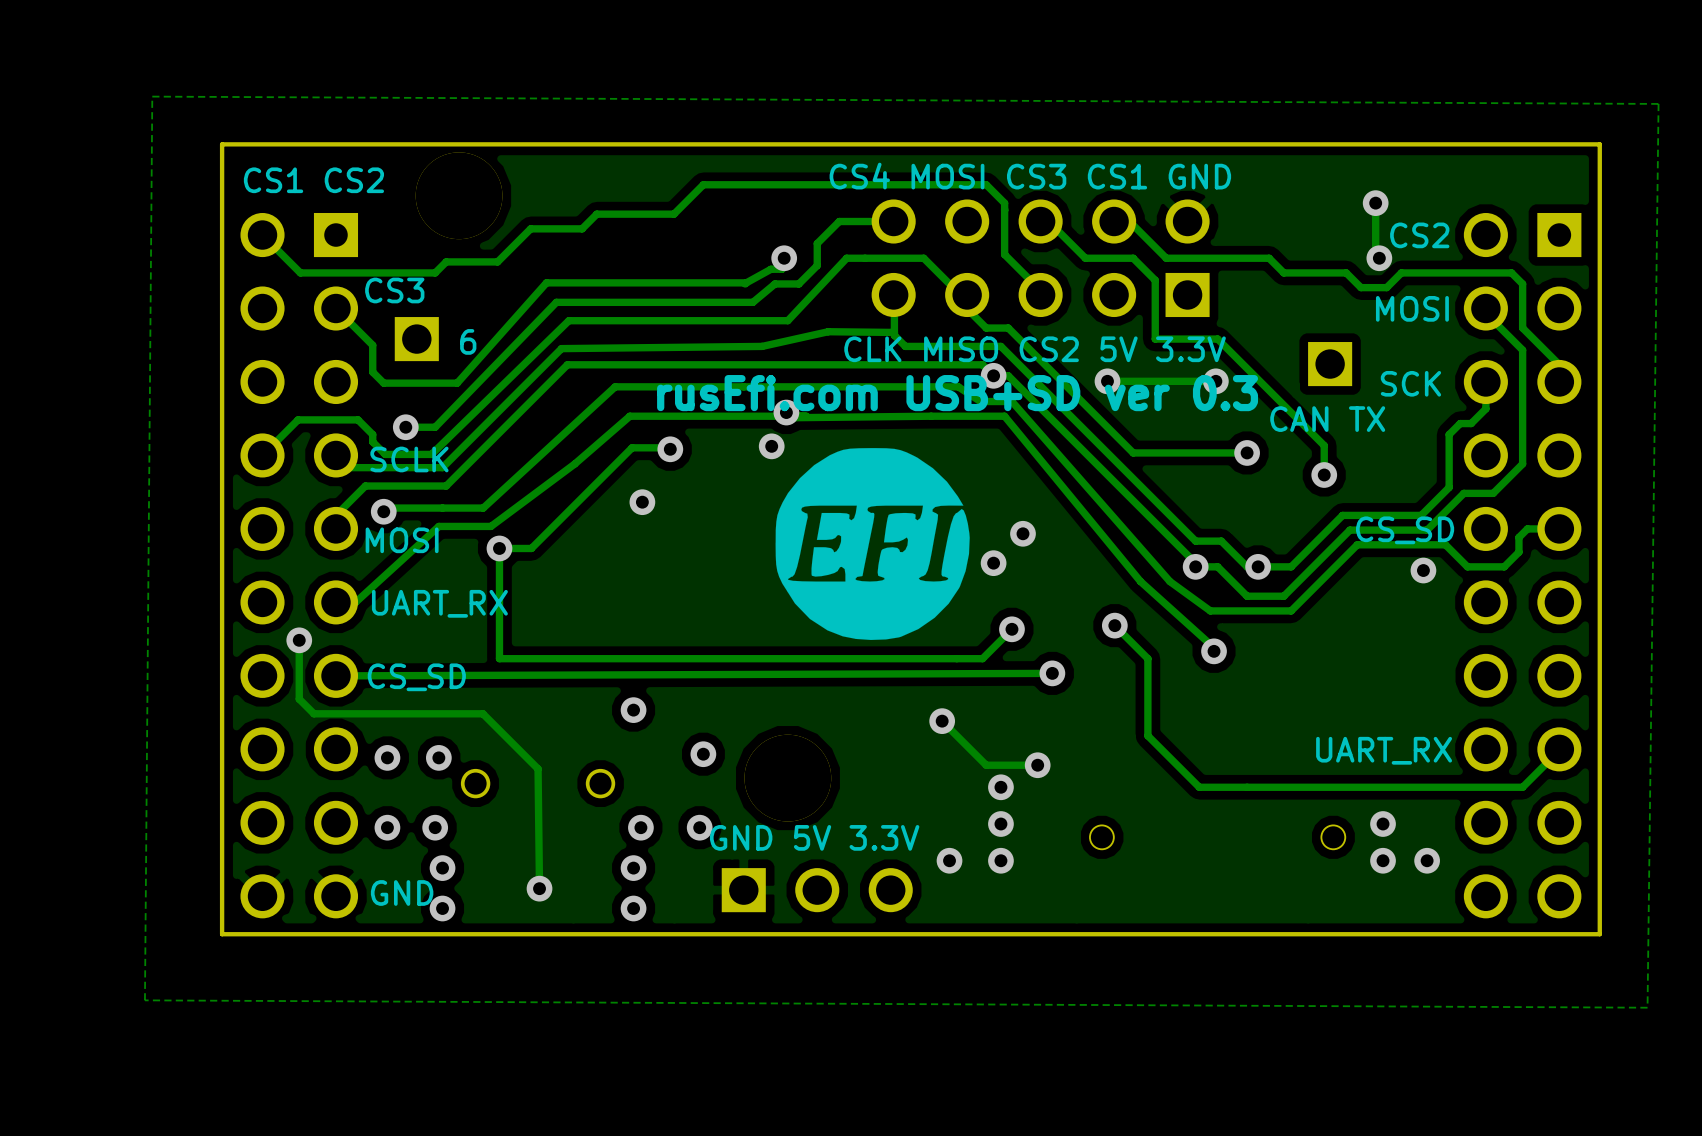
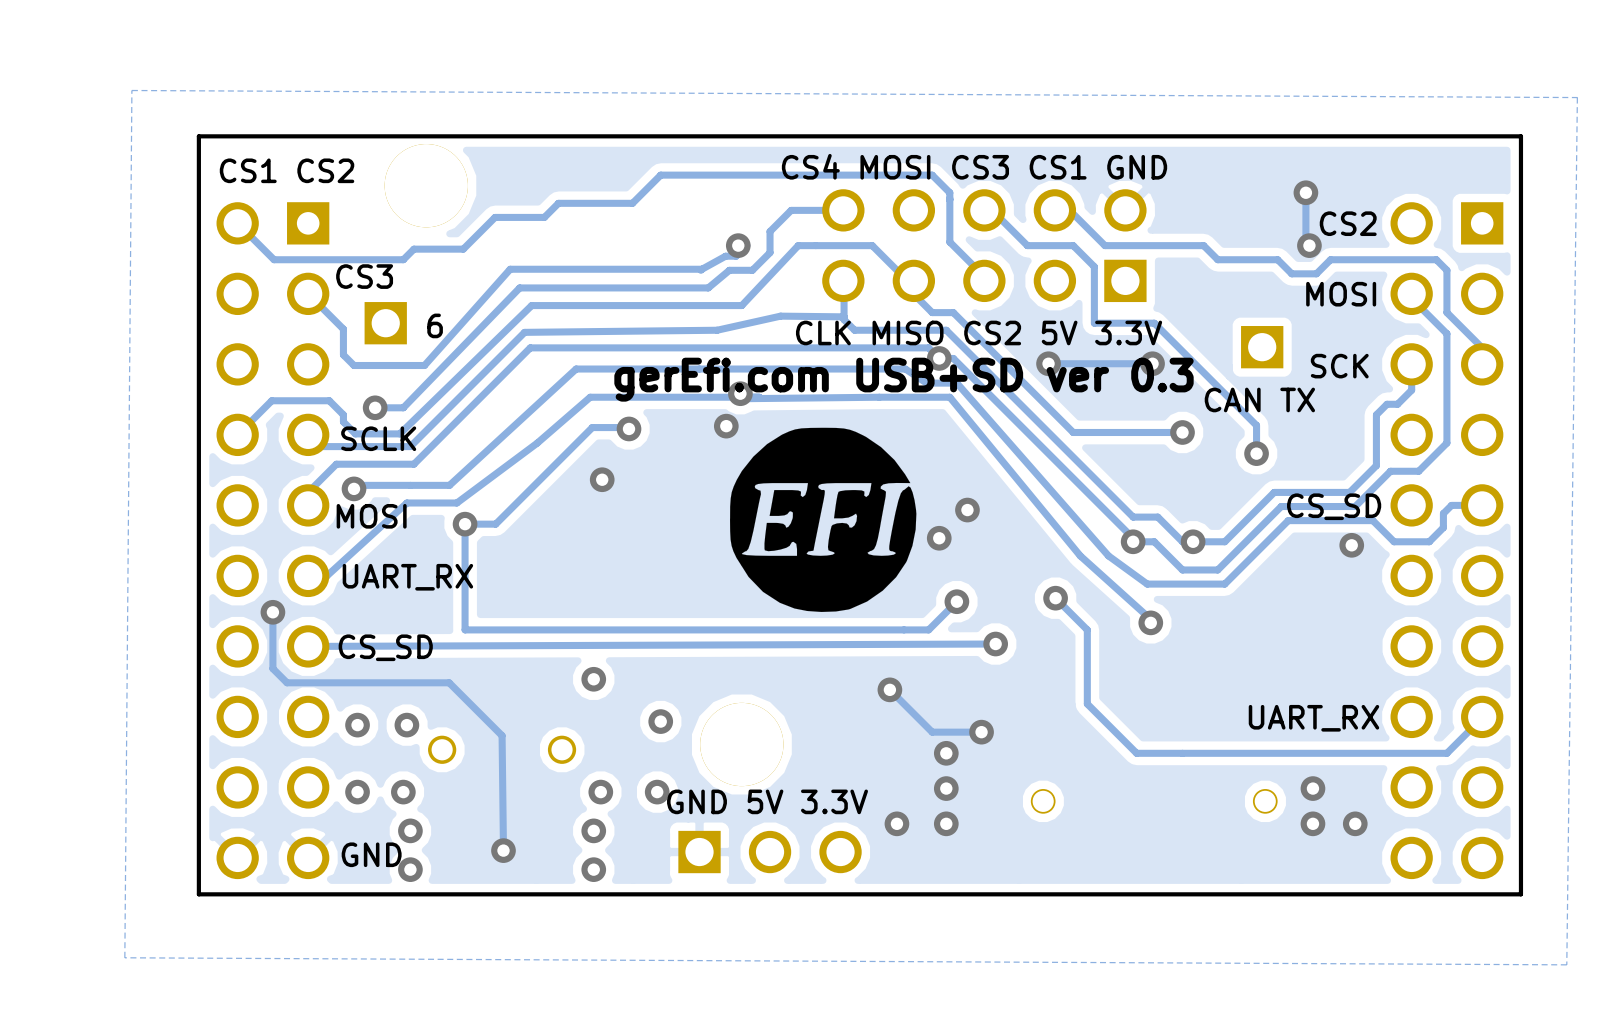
text: rusEfi.com USB+SD ver 0.3 (957, 393) -> gerEfi.com USB+SD ver 0.3 (903, 379)

